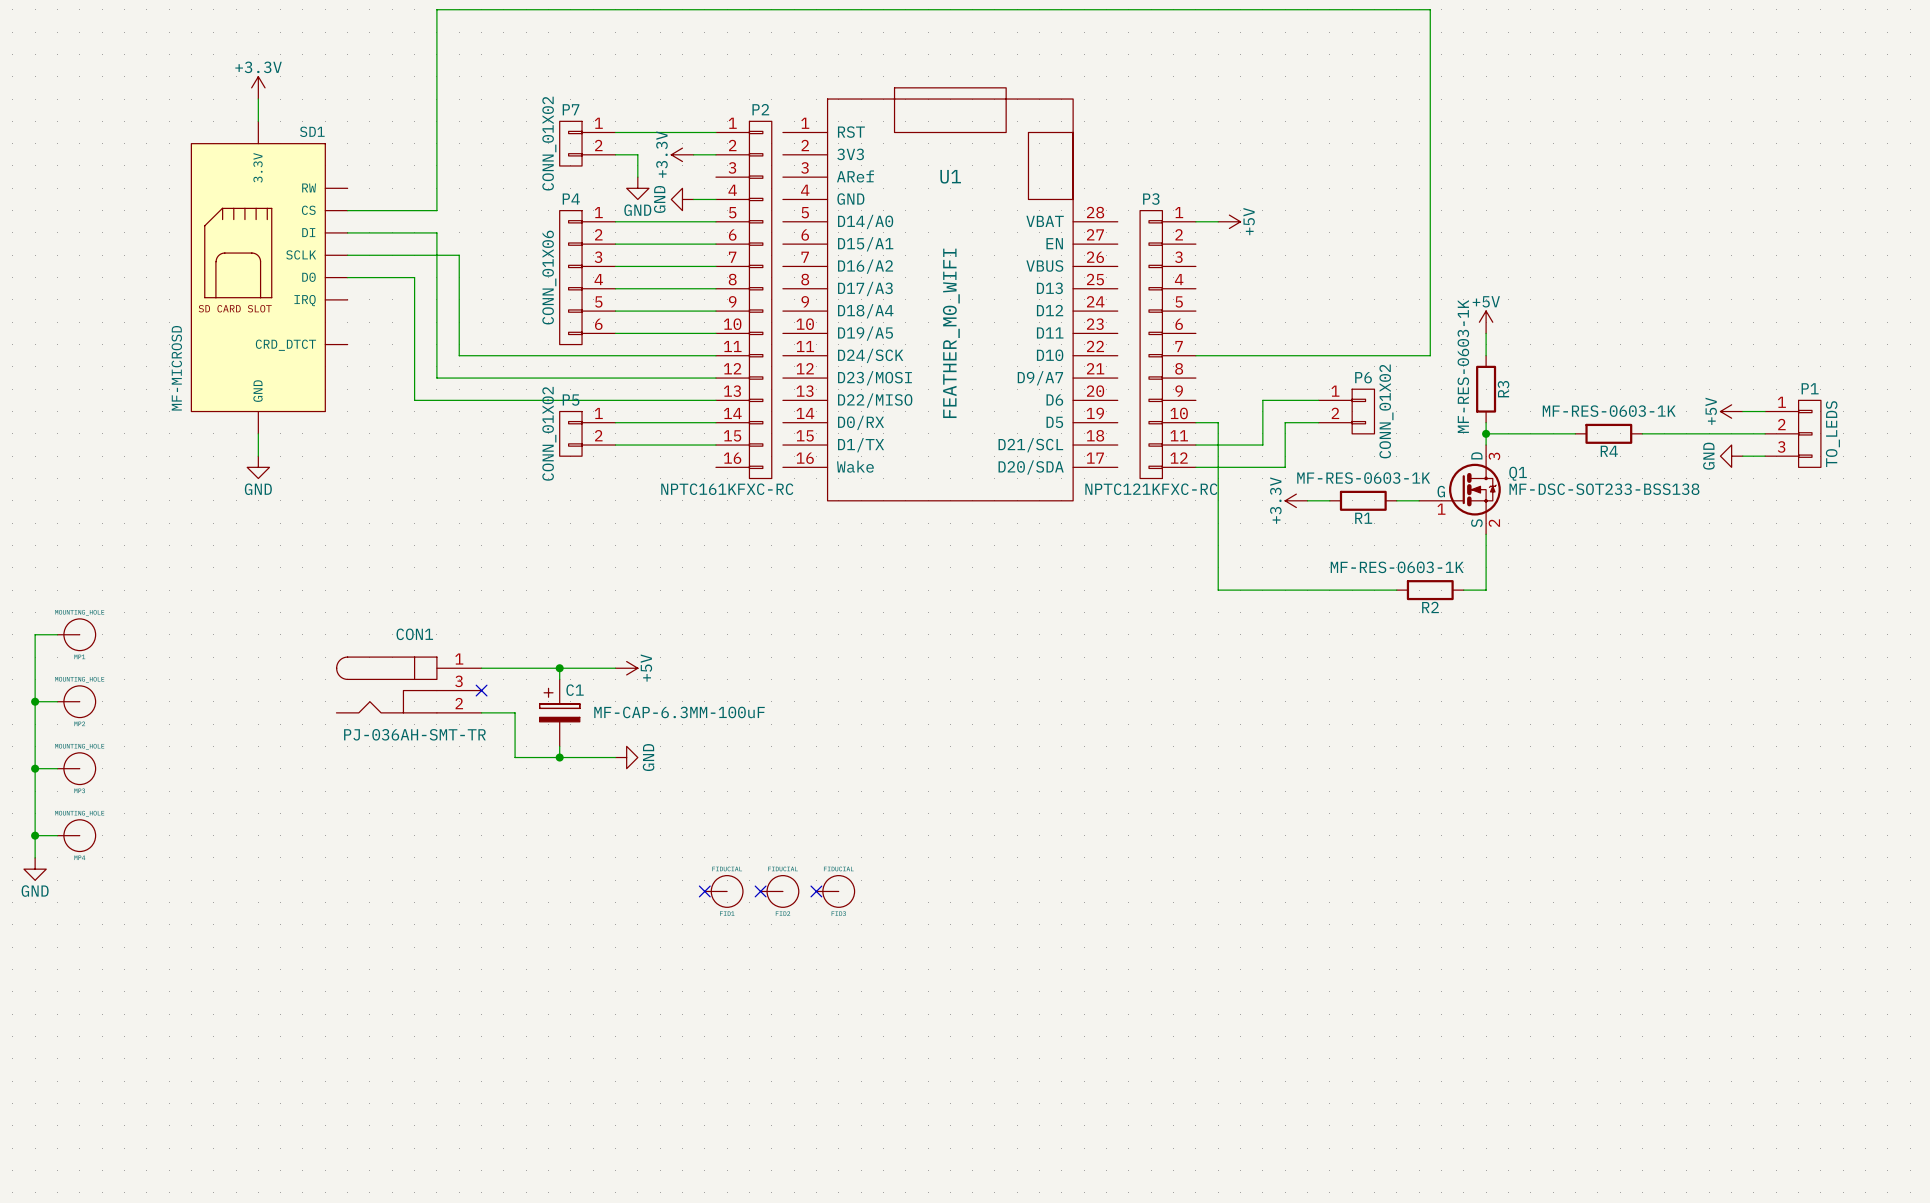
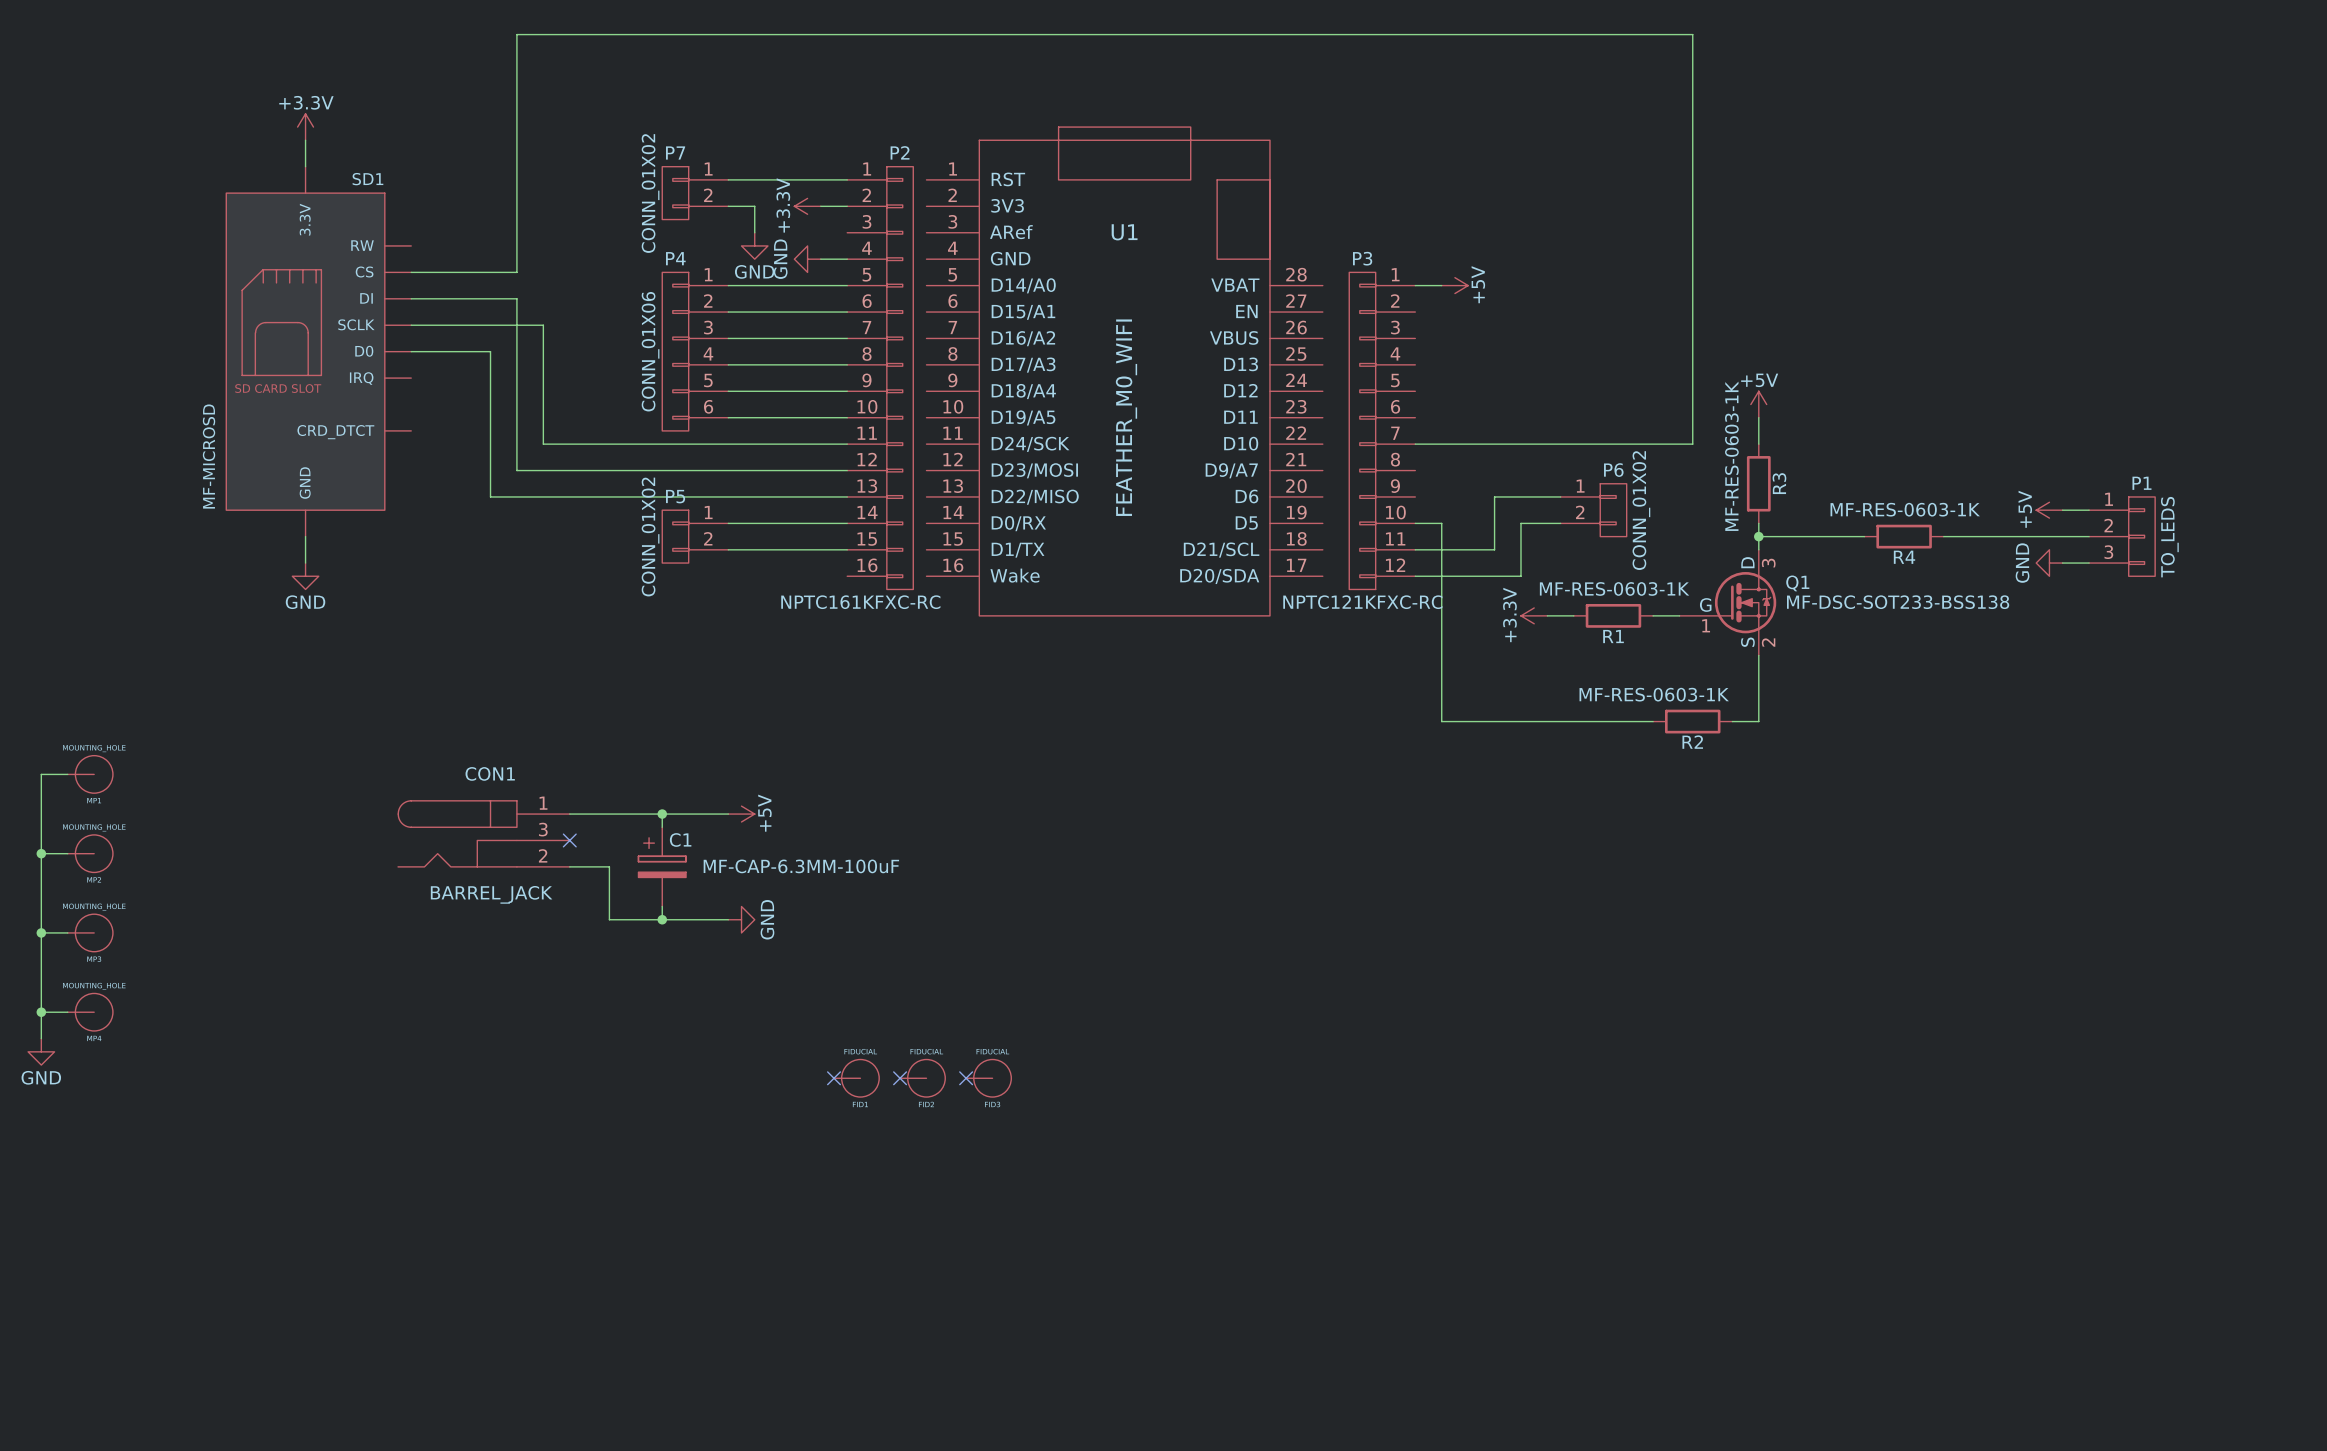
CON1 value: PJ-036AH-SMT-TR (414, 734) -> BARREL_JACK (491, 894)

